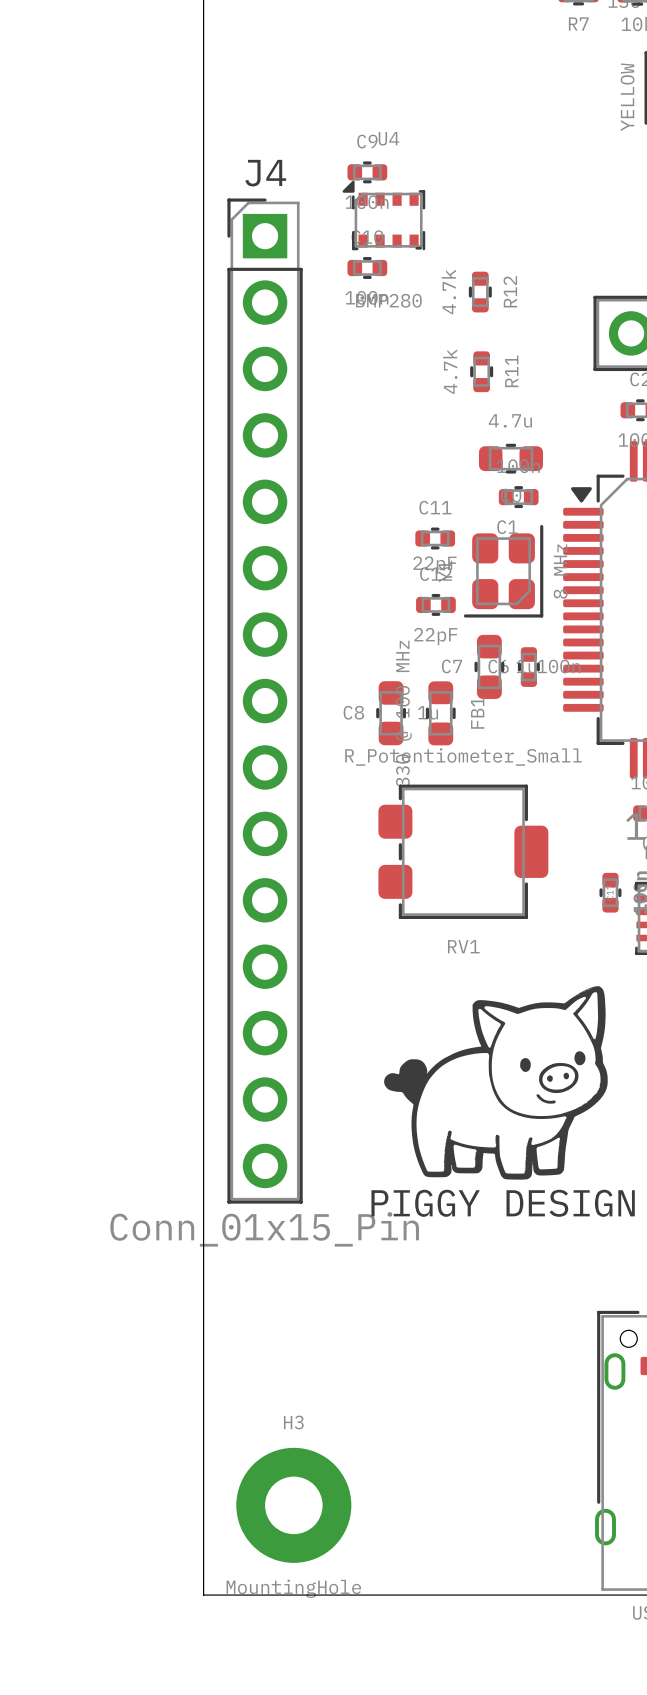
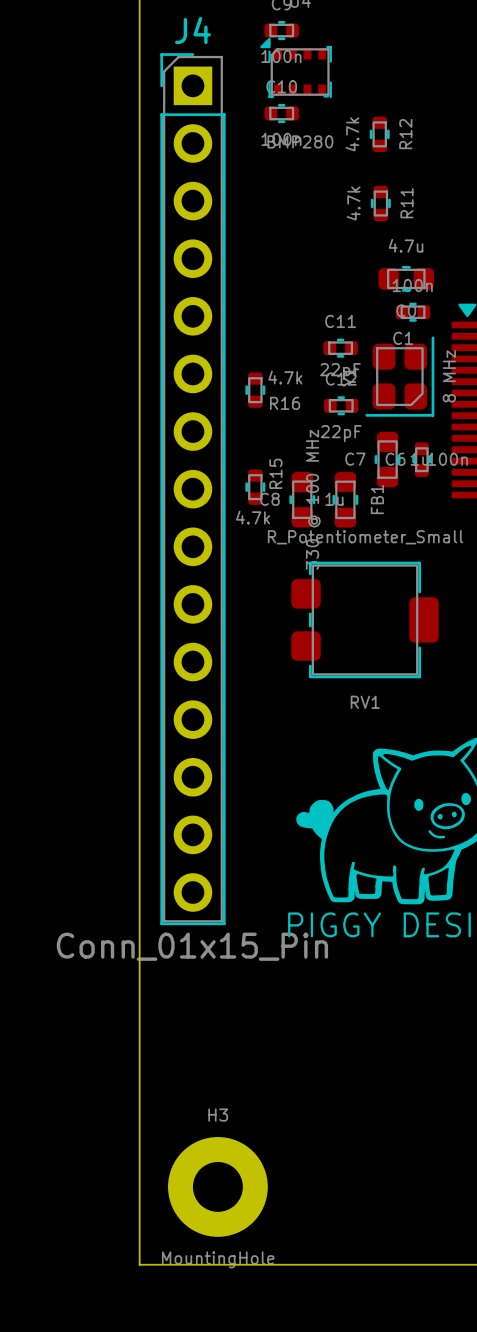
R16: none -> 4.7k (255, 390)
R15: none -> 4.7k (255, 487)

